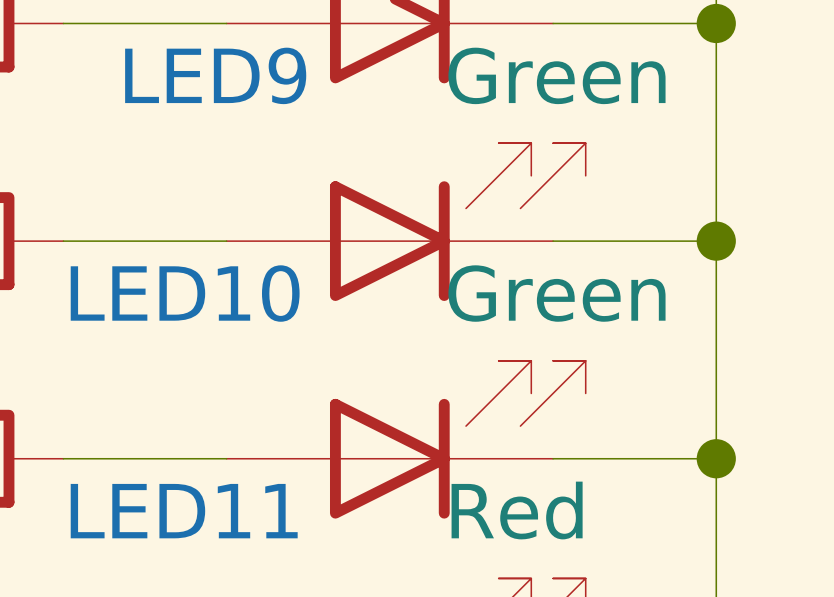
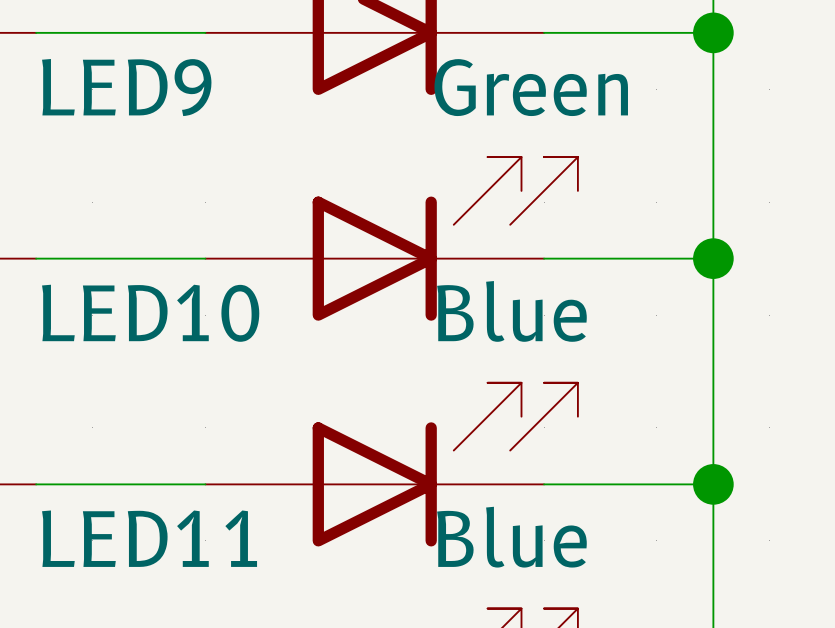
LED9 name position: LED9 (215, 75) -> LED9 (126, 87)
LED10 value: Green (556, 293) -> Blue (511, 311)
LED11 value: Red (517, 510) -> Blue (511, 537)

